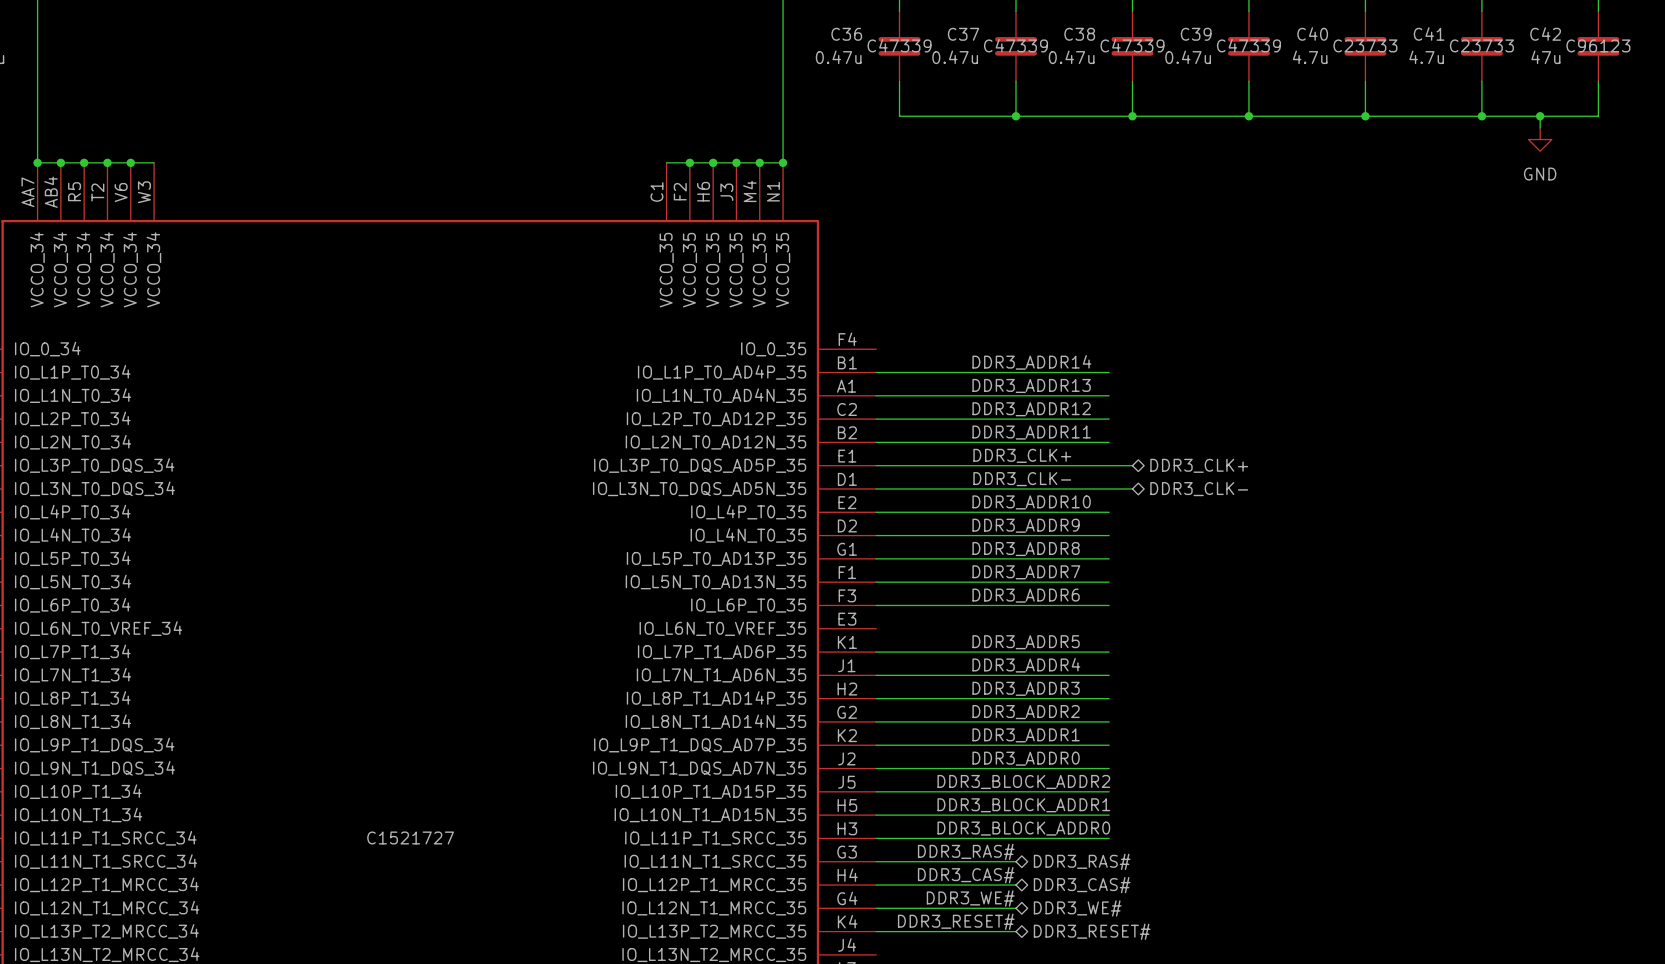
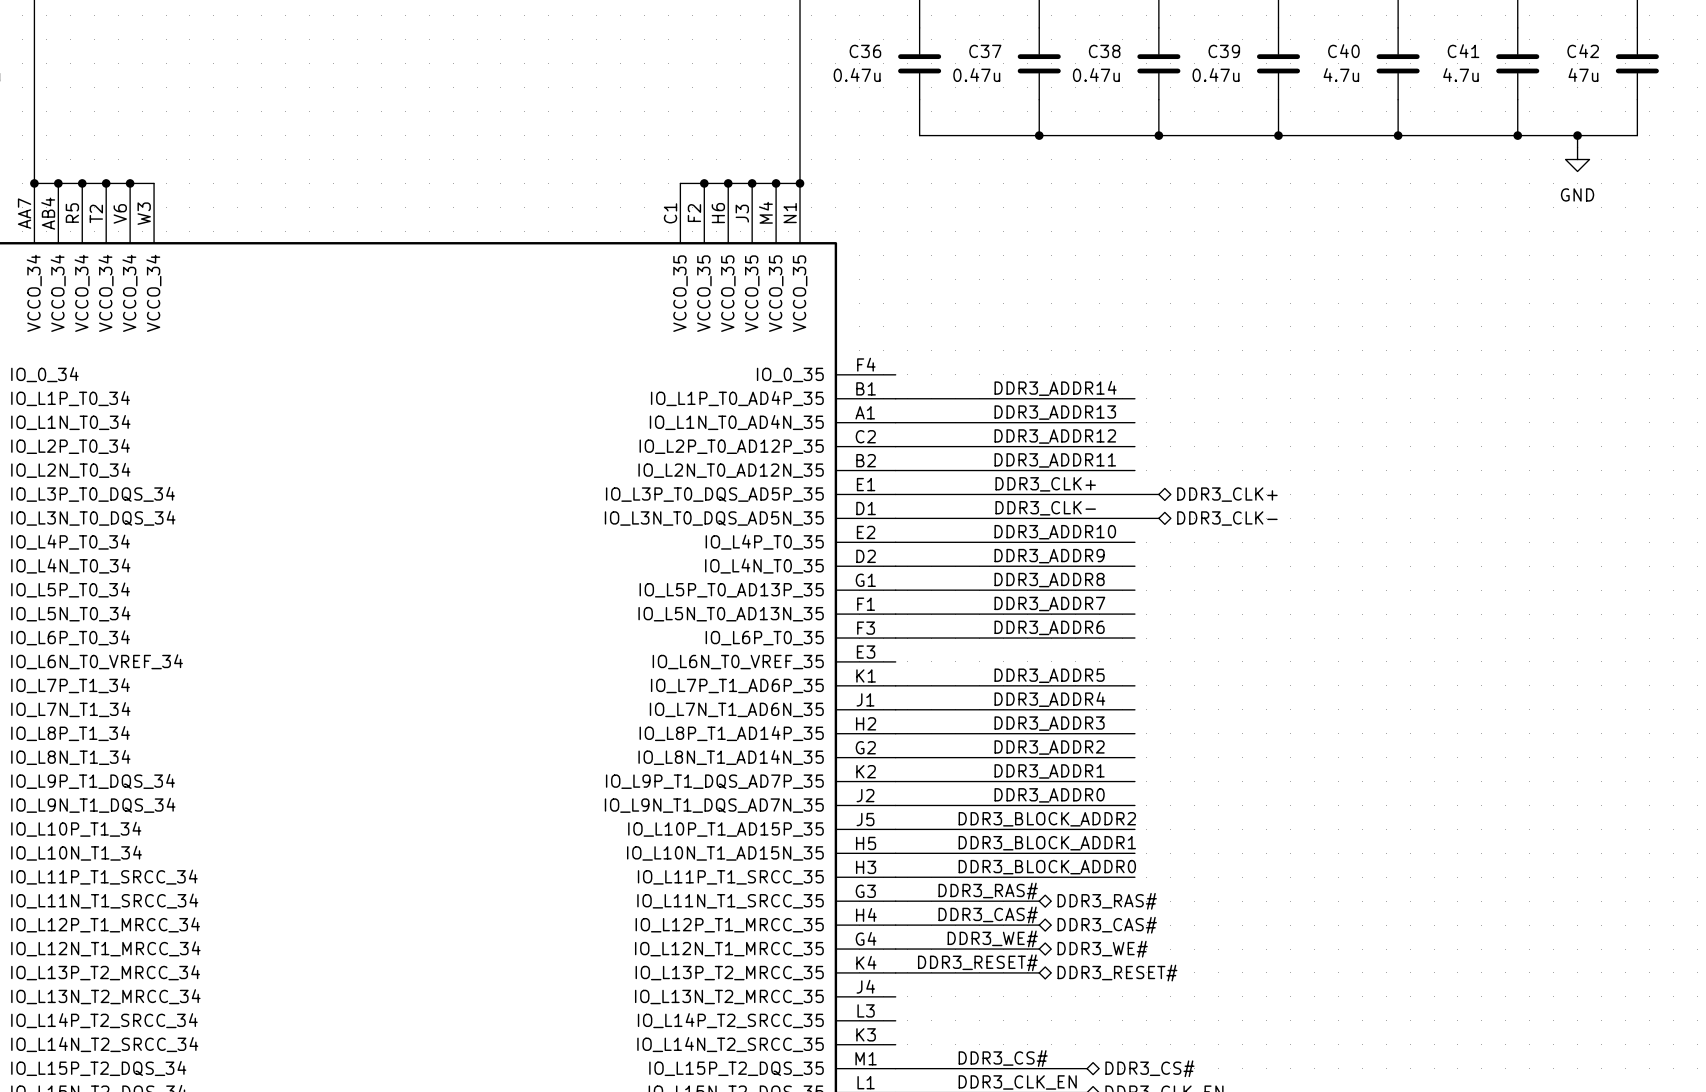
C36 text: C47339 (899, 45) -> none
C37 text: C47339 (1016, 45) -> none
C38 text: C47339 (1132, 45) -> none
C39 text: C47339 (1248, 45) -> none
C40 text: C23733 (1365, 45) -> none
C41 text: C23733 (1481, 45) -> none
C42 text: C96123 (1598, 45) -> none
part text: C1521727 (410, 837) -> none

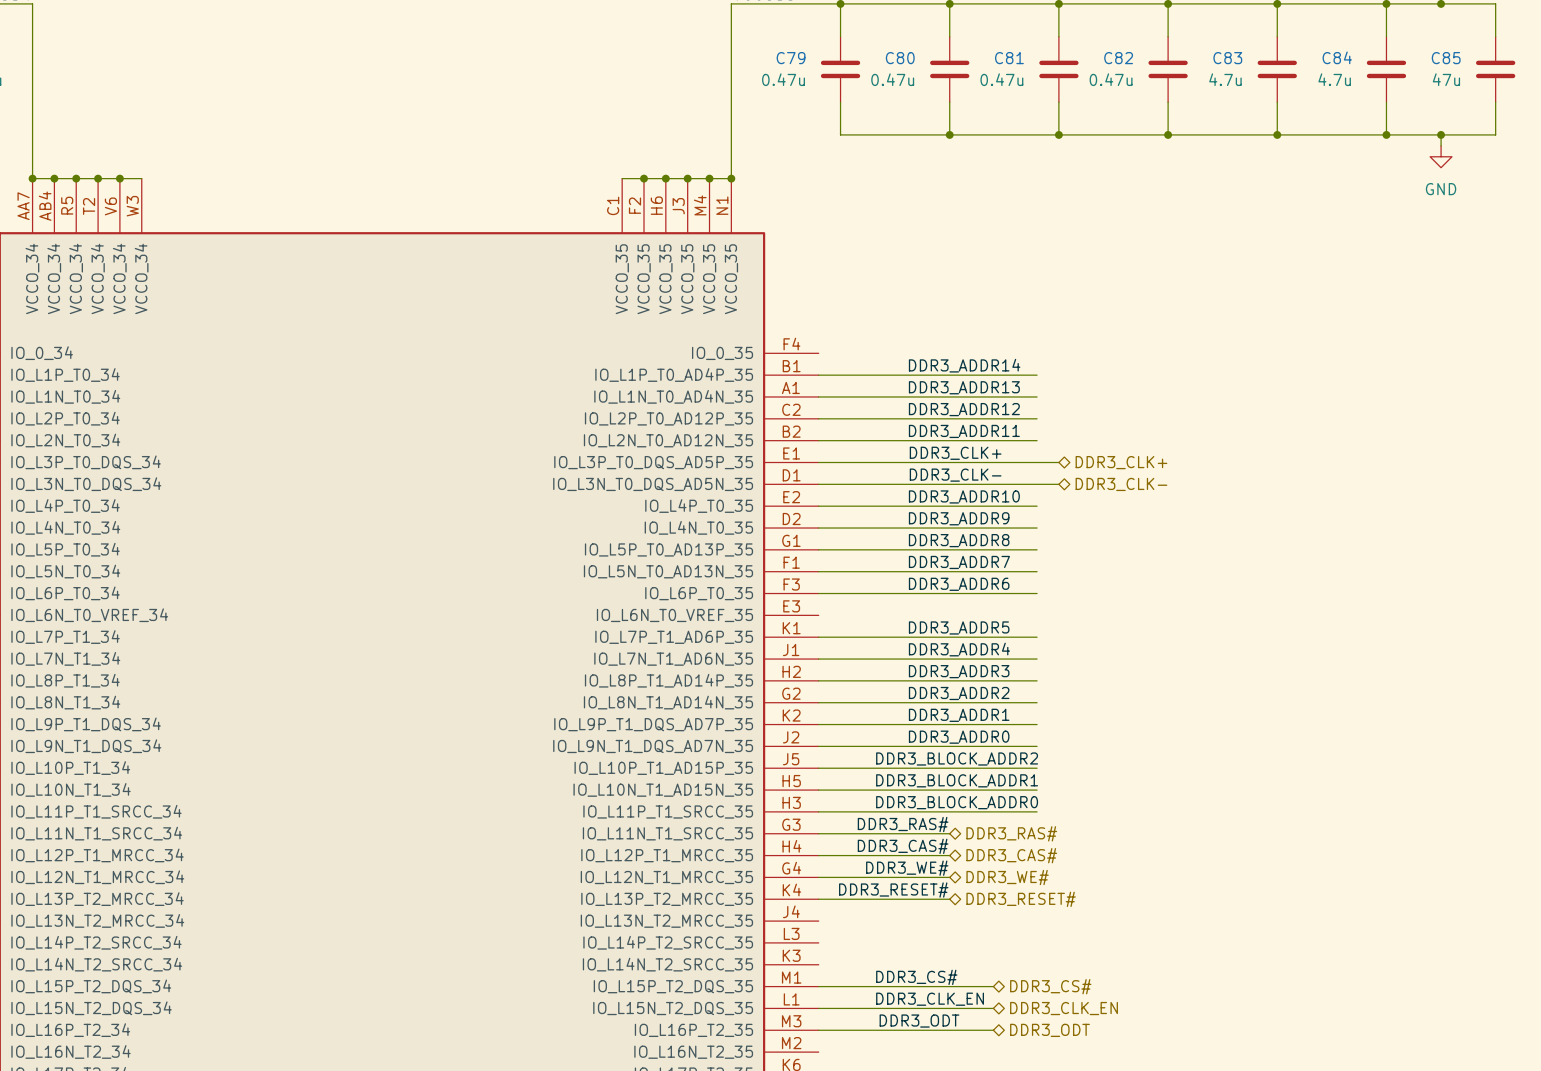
C36 name: C36 (865, 51) -> C79 (791, 58)
C37 name: C37 (985, 51) -> C80 (900, 58)
C38 name: C38 (1104, 51) -> C81 (1009, 58)
C39 name: C39 (1224, 51) -> C82 (1118, 58)
C40 name: C40 (1343, 51) -> C83 (1227, 58)
C41 name: C41 (1463, 51) -> C84 (1337, 57)
C42 name: C42 (1583, 51) -> C85 (1446, 58)

